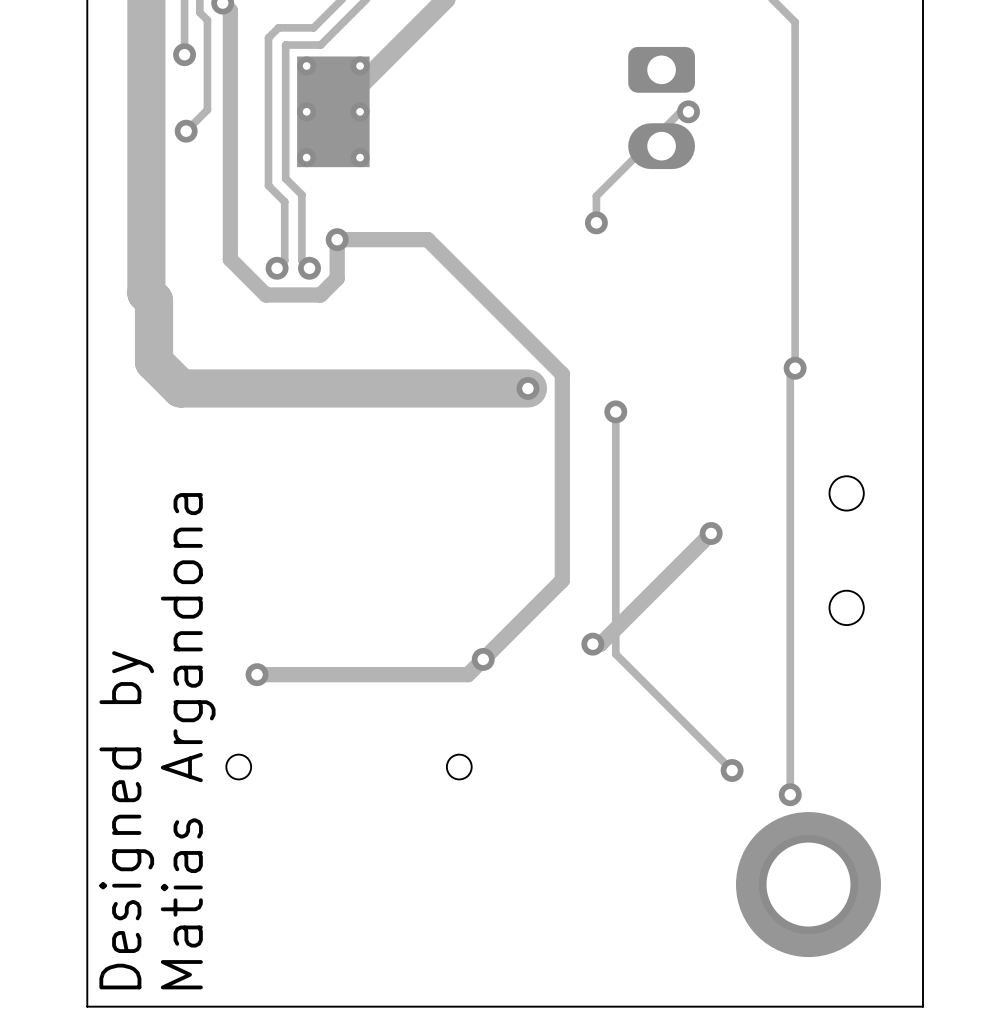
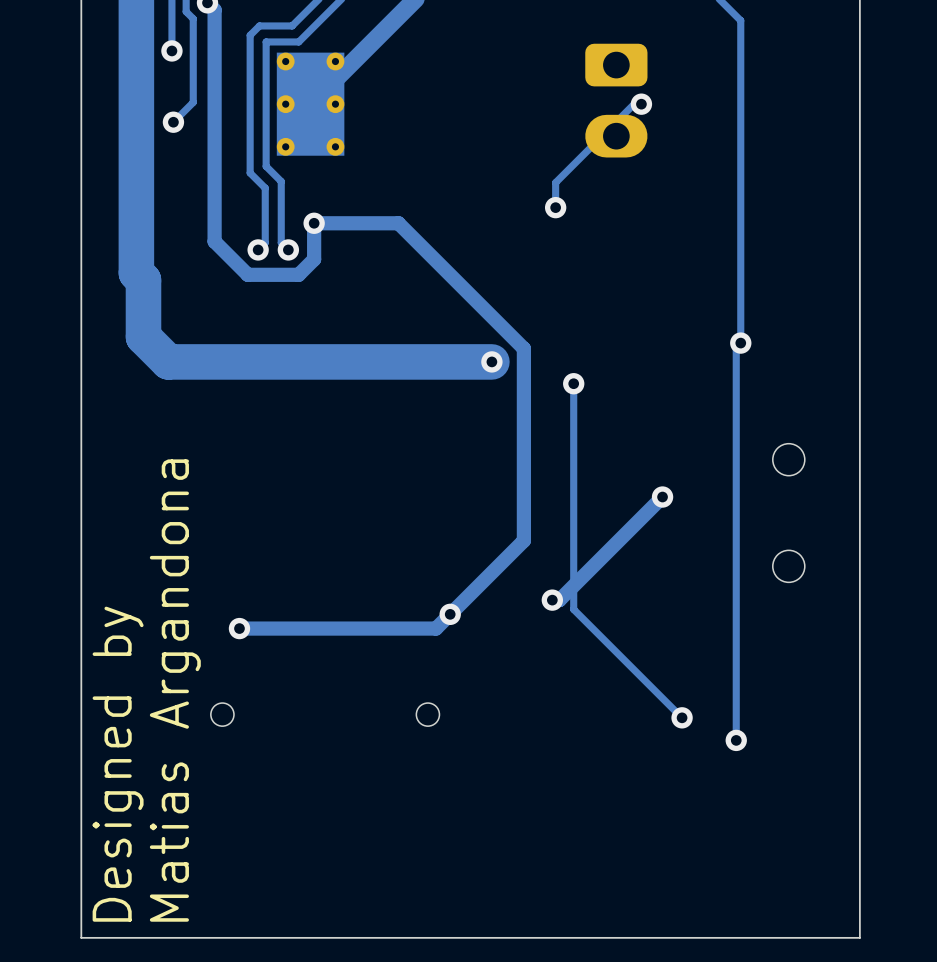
part: (808, 884) -> none

